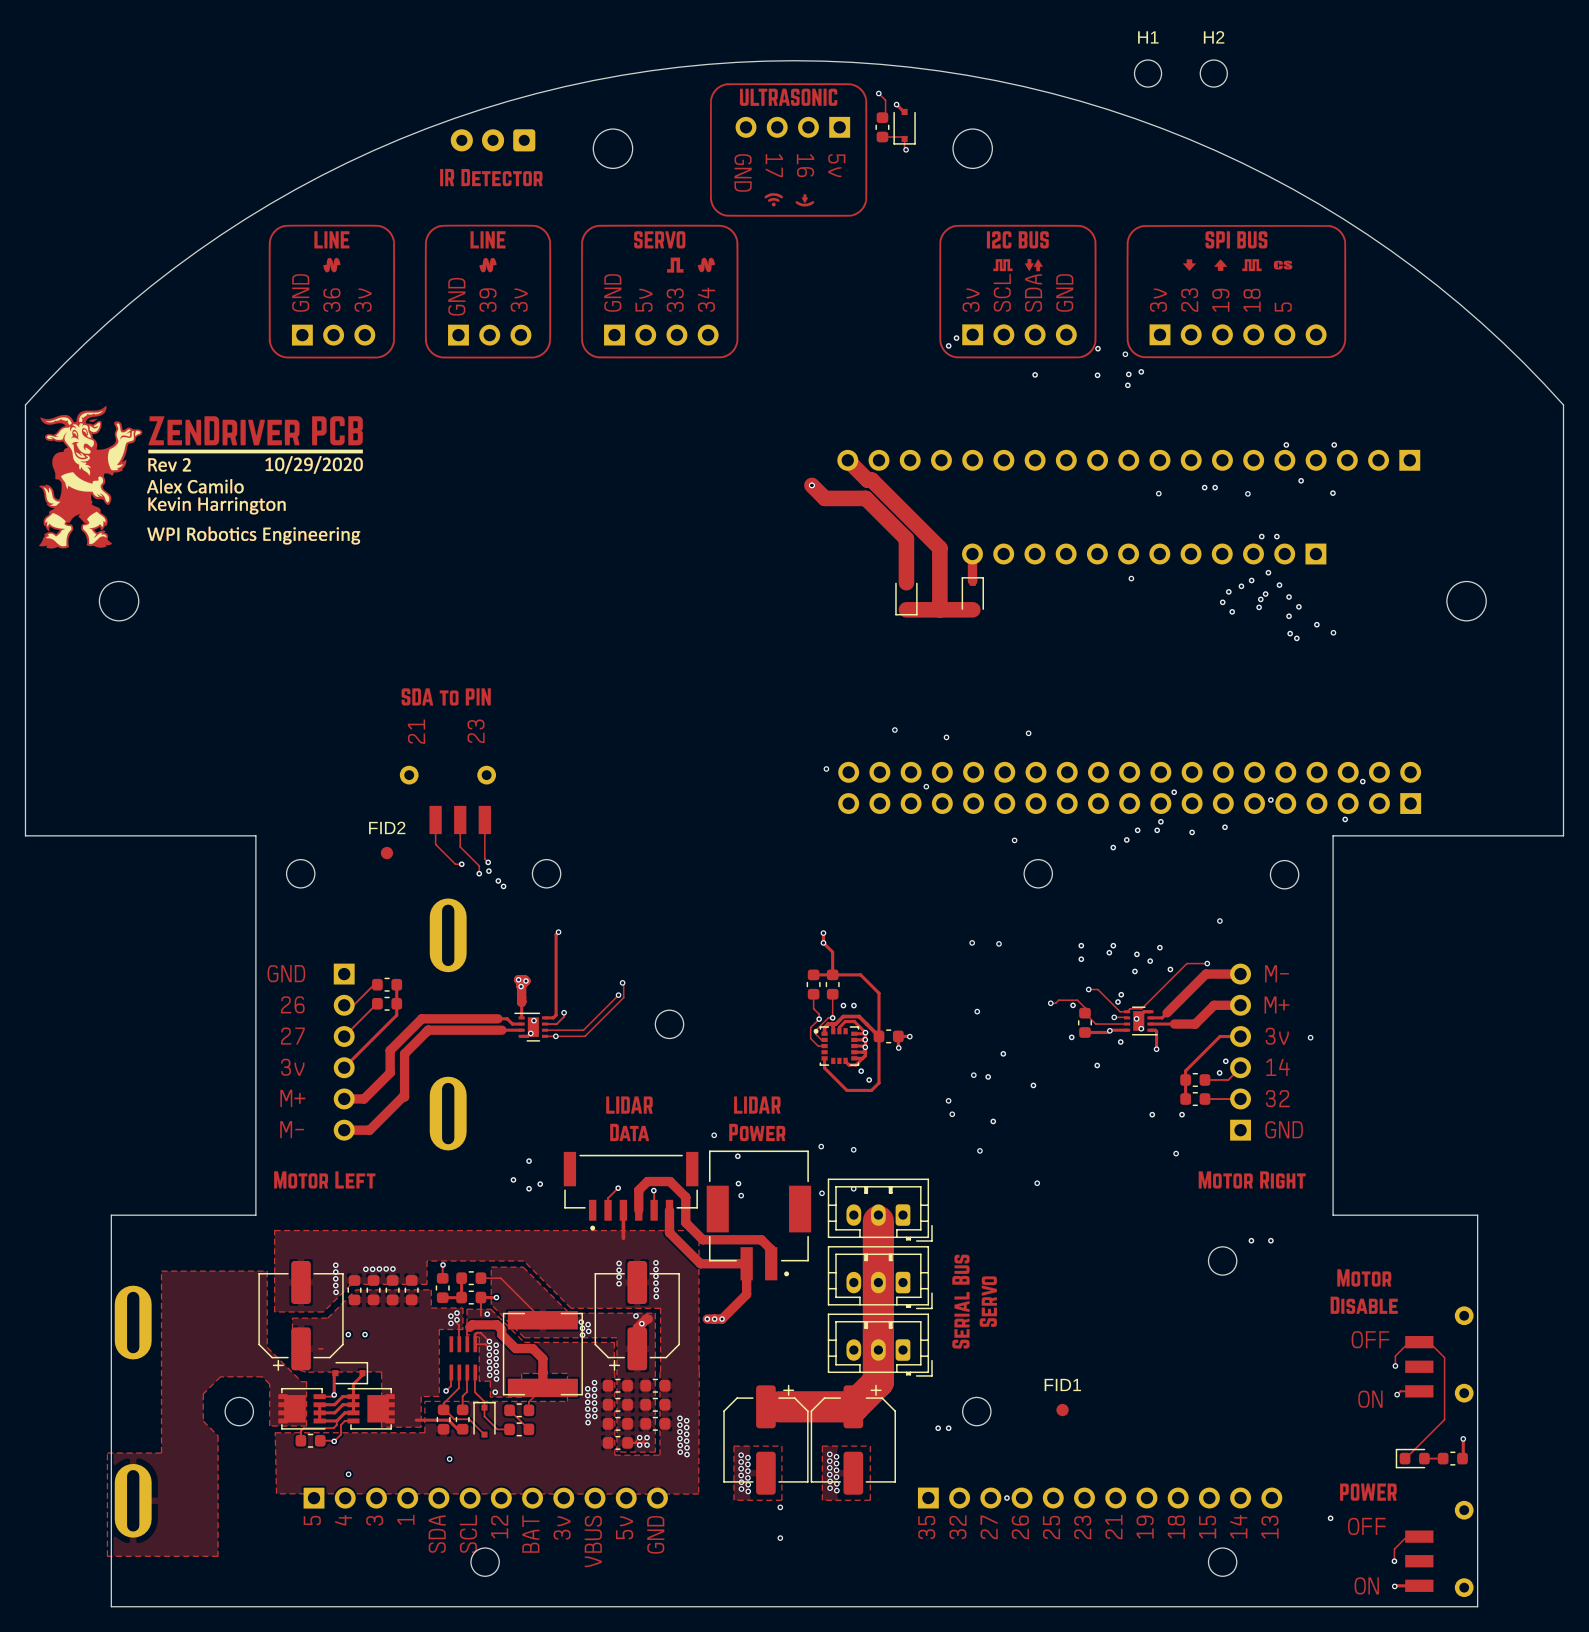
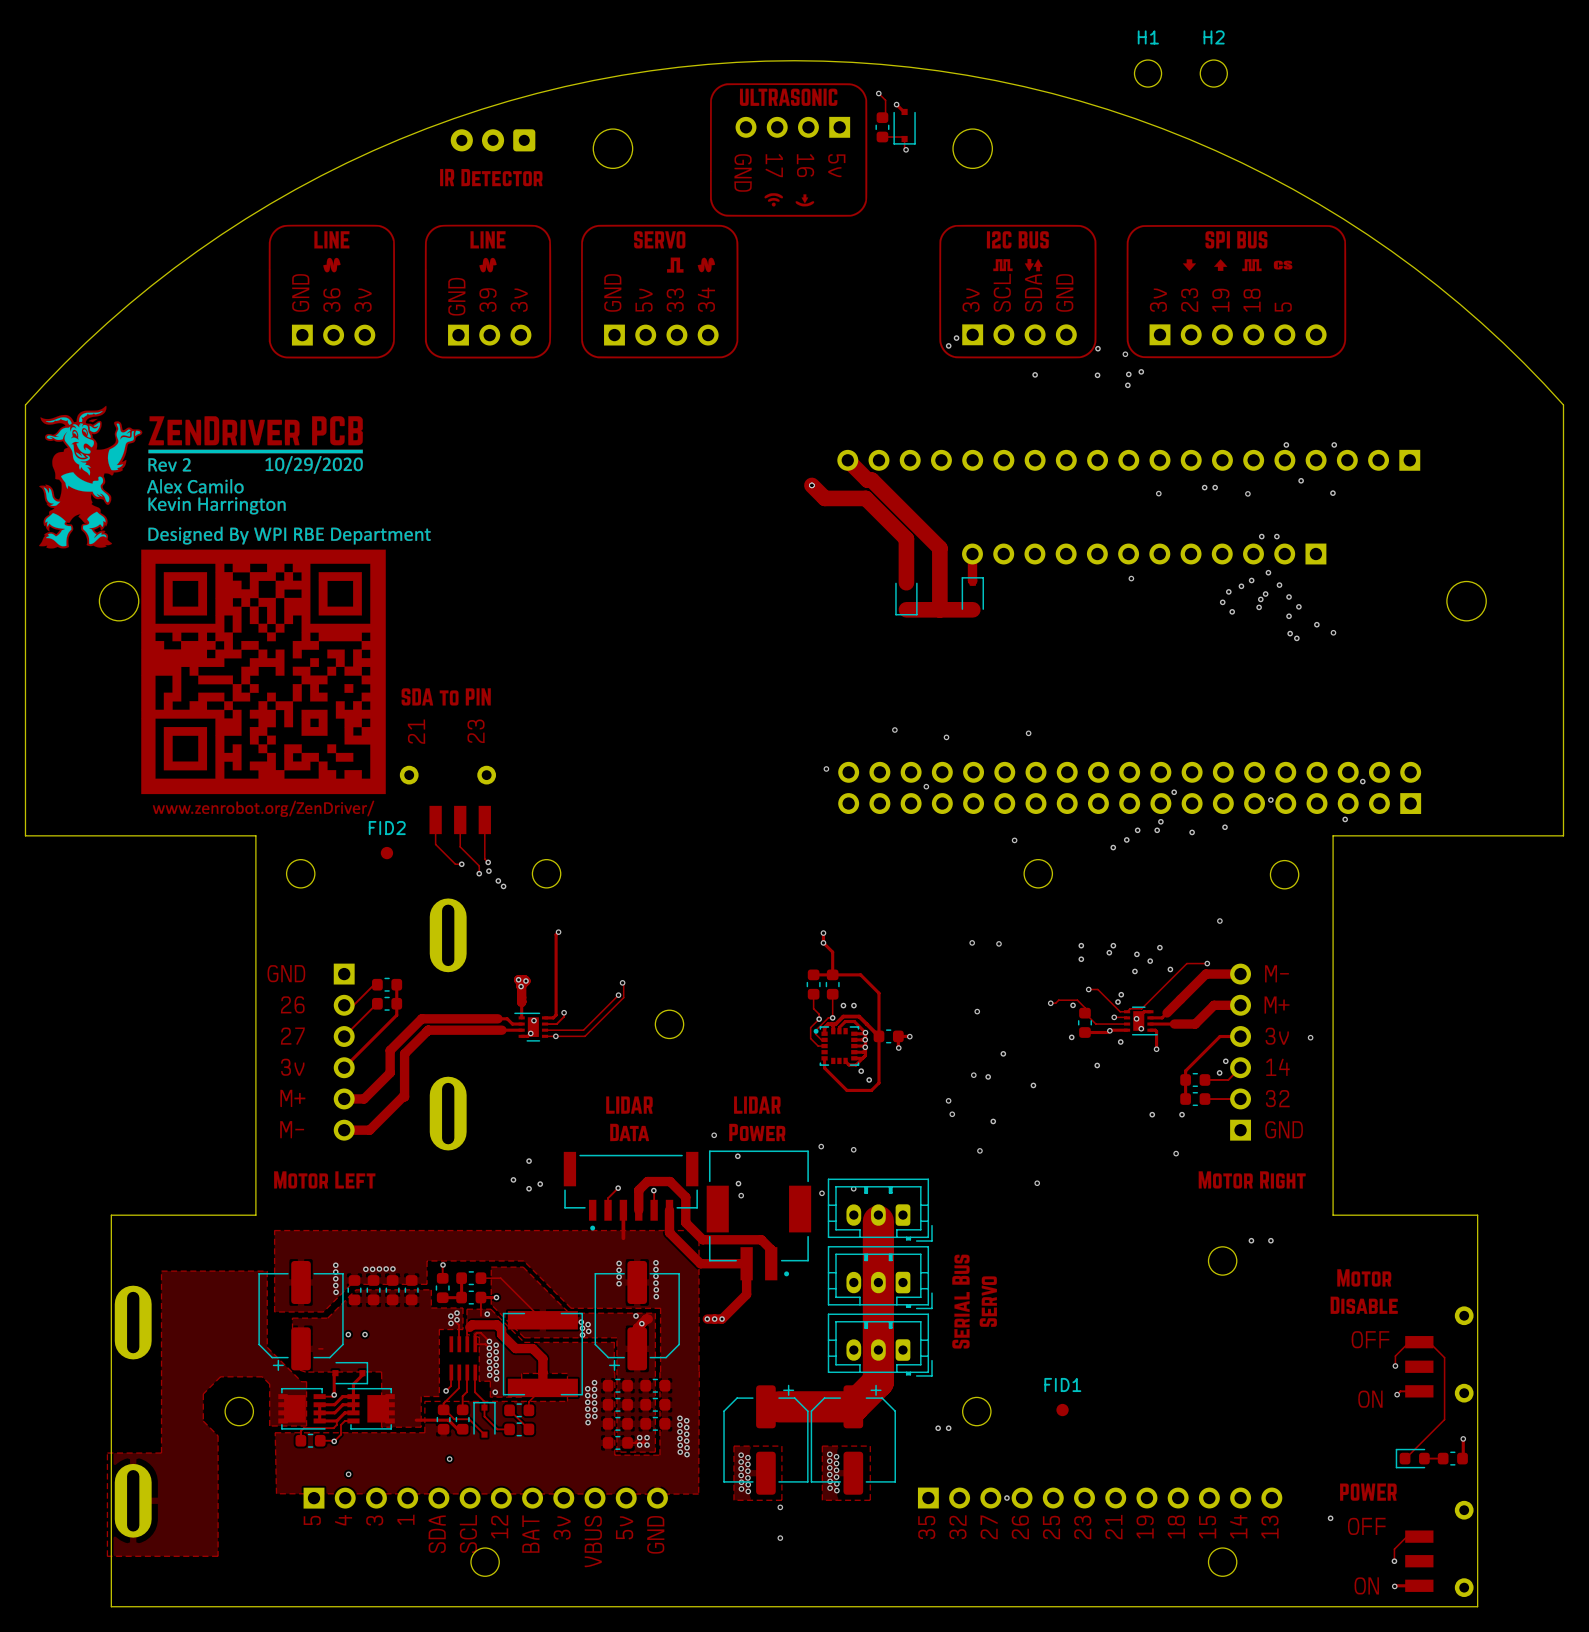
drawing shape: [38, 83, 1398, 1595] -> [38, 83, 1398, 1595]

